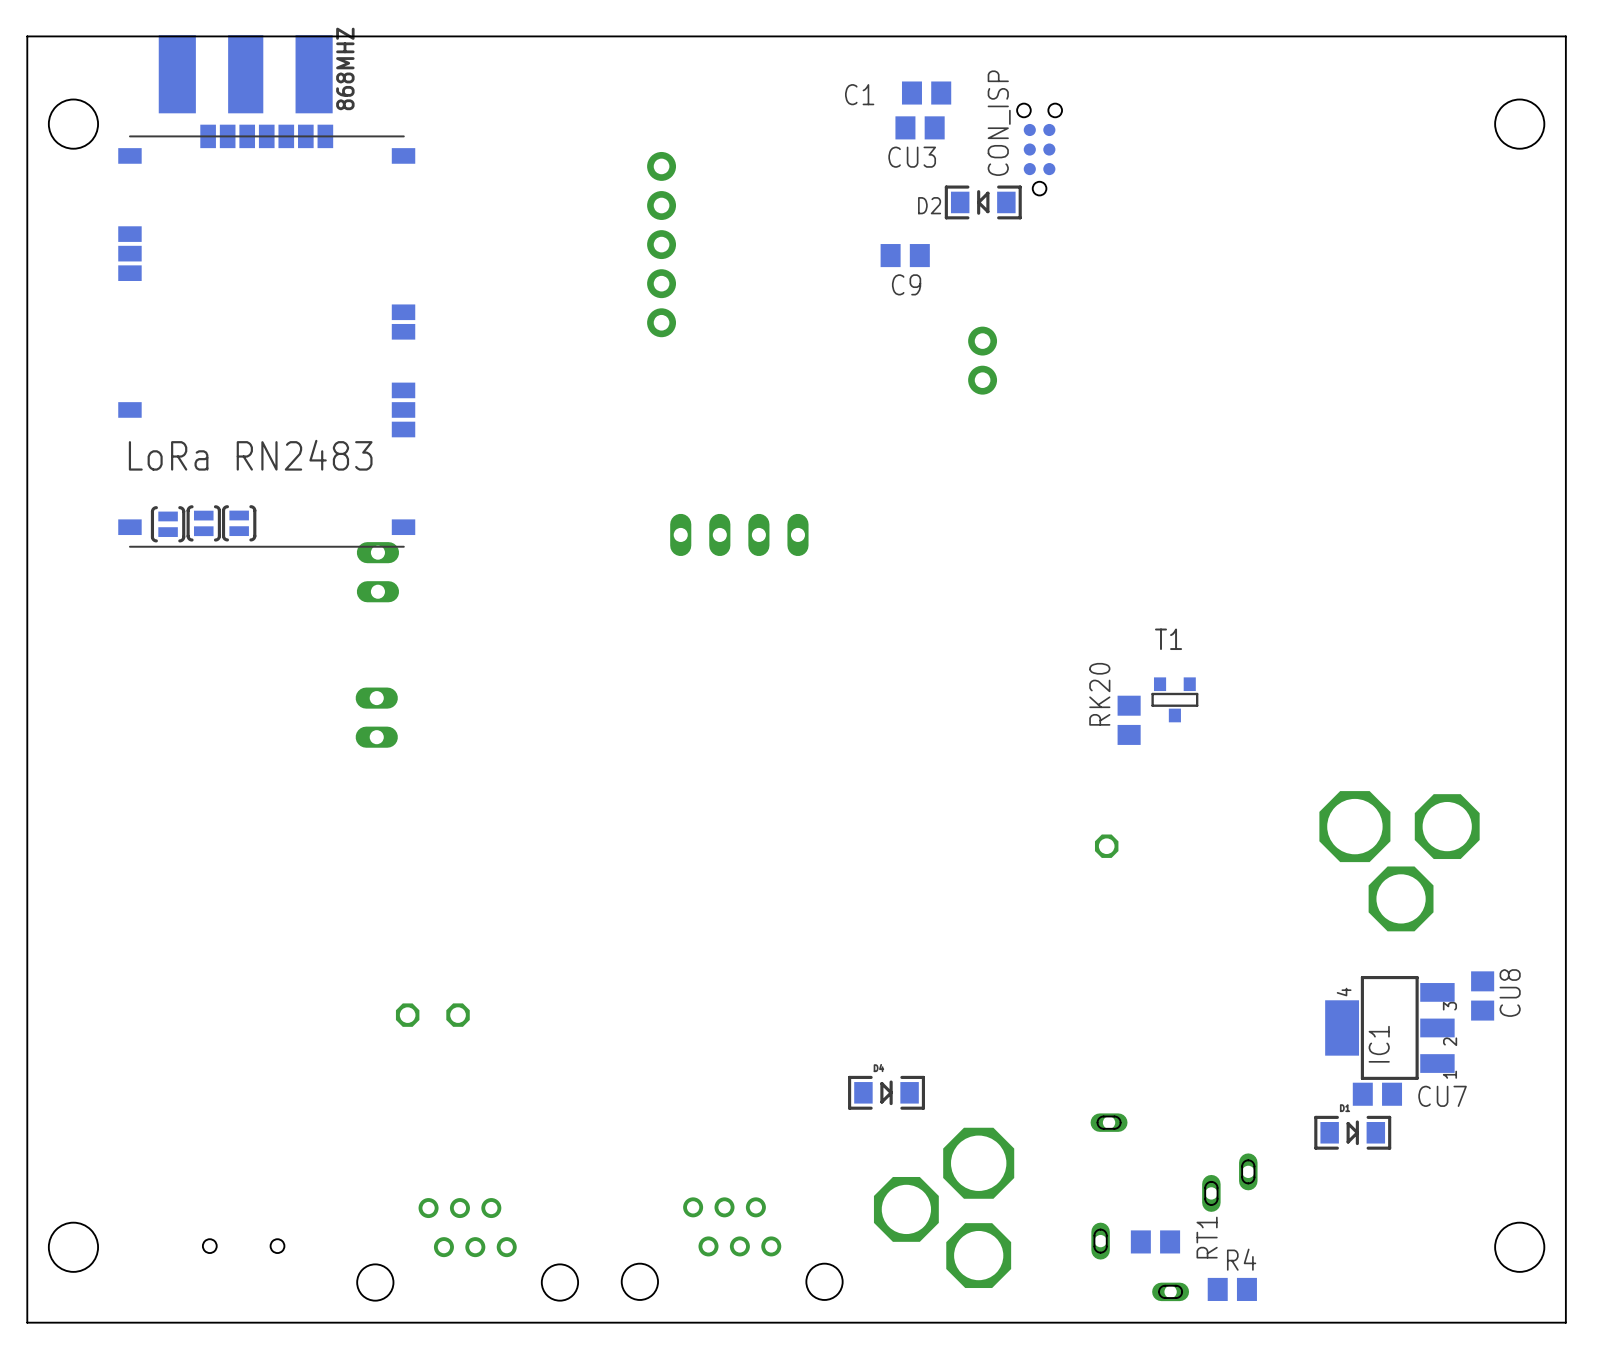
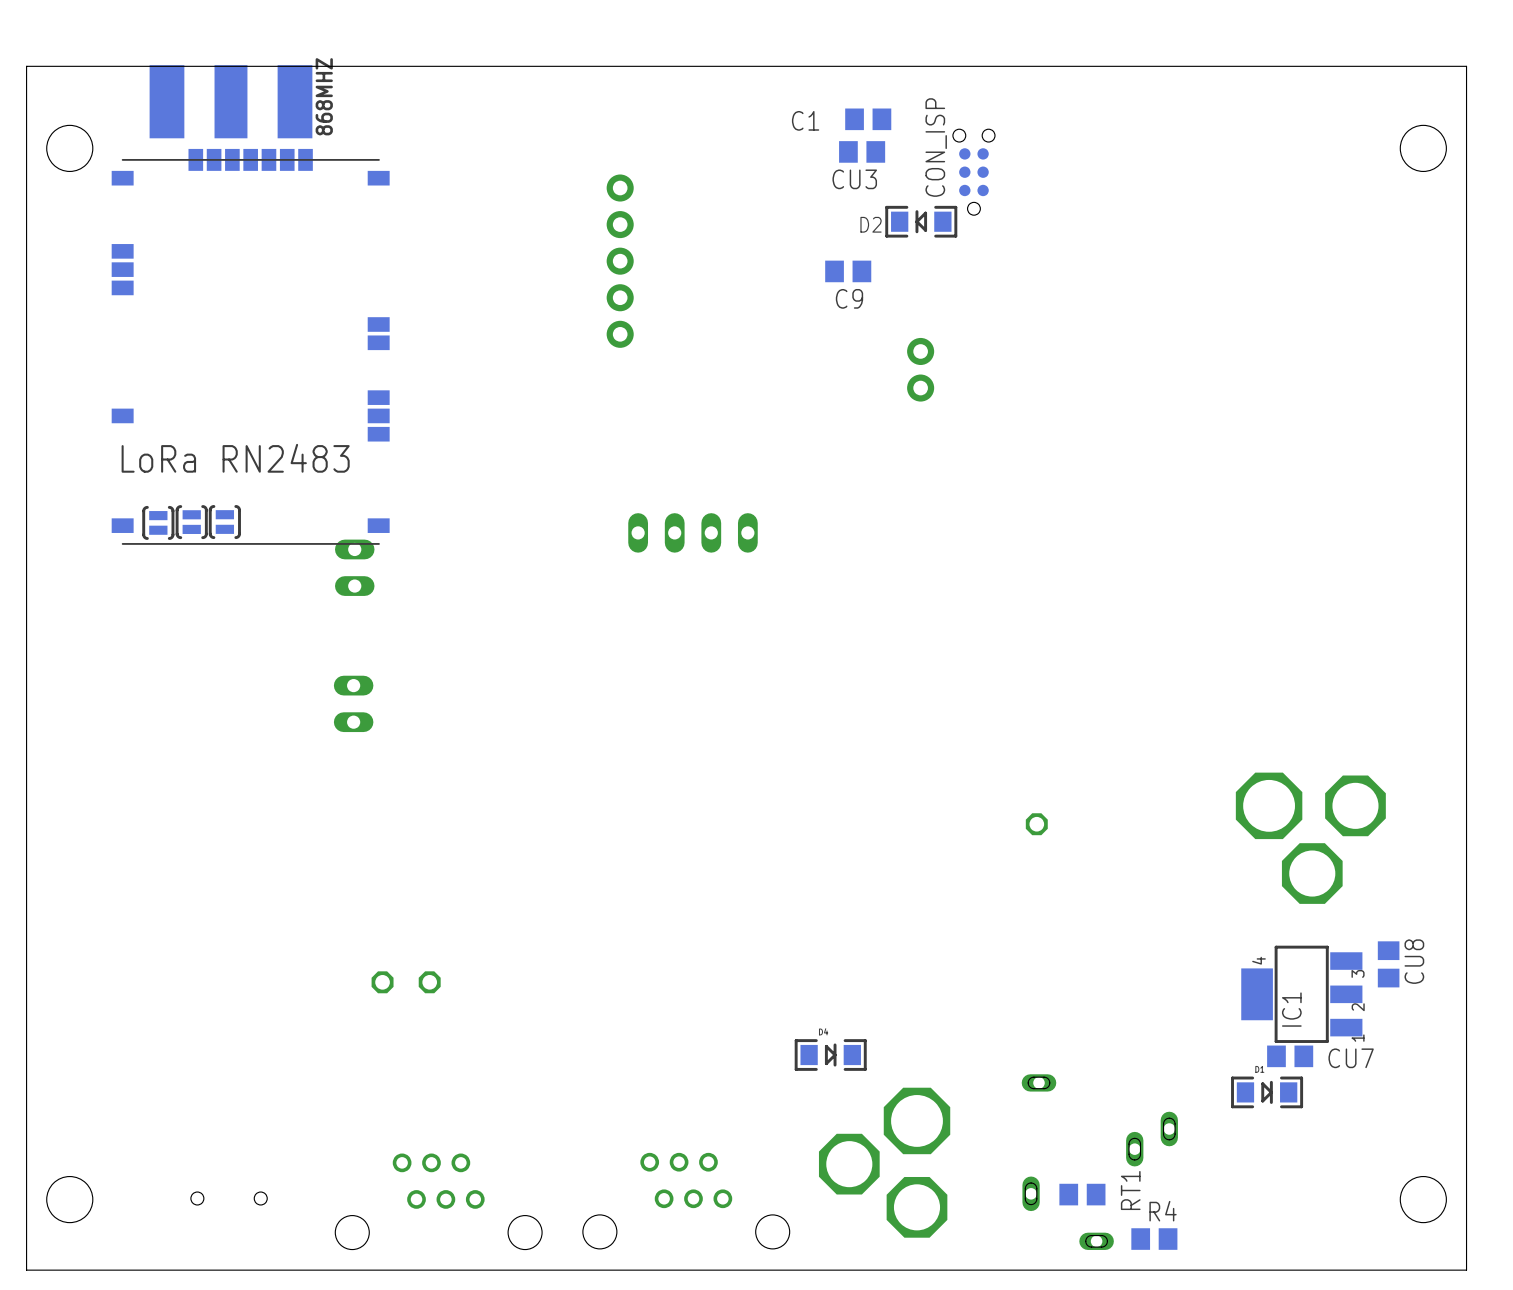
T1: (1174, 699) -> none
RK20: (1129, 720) -> none

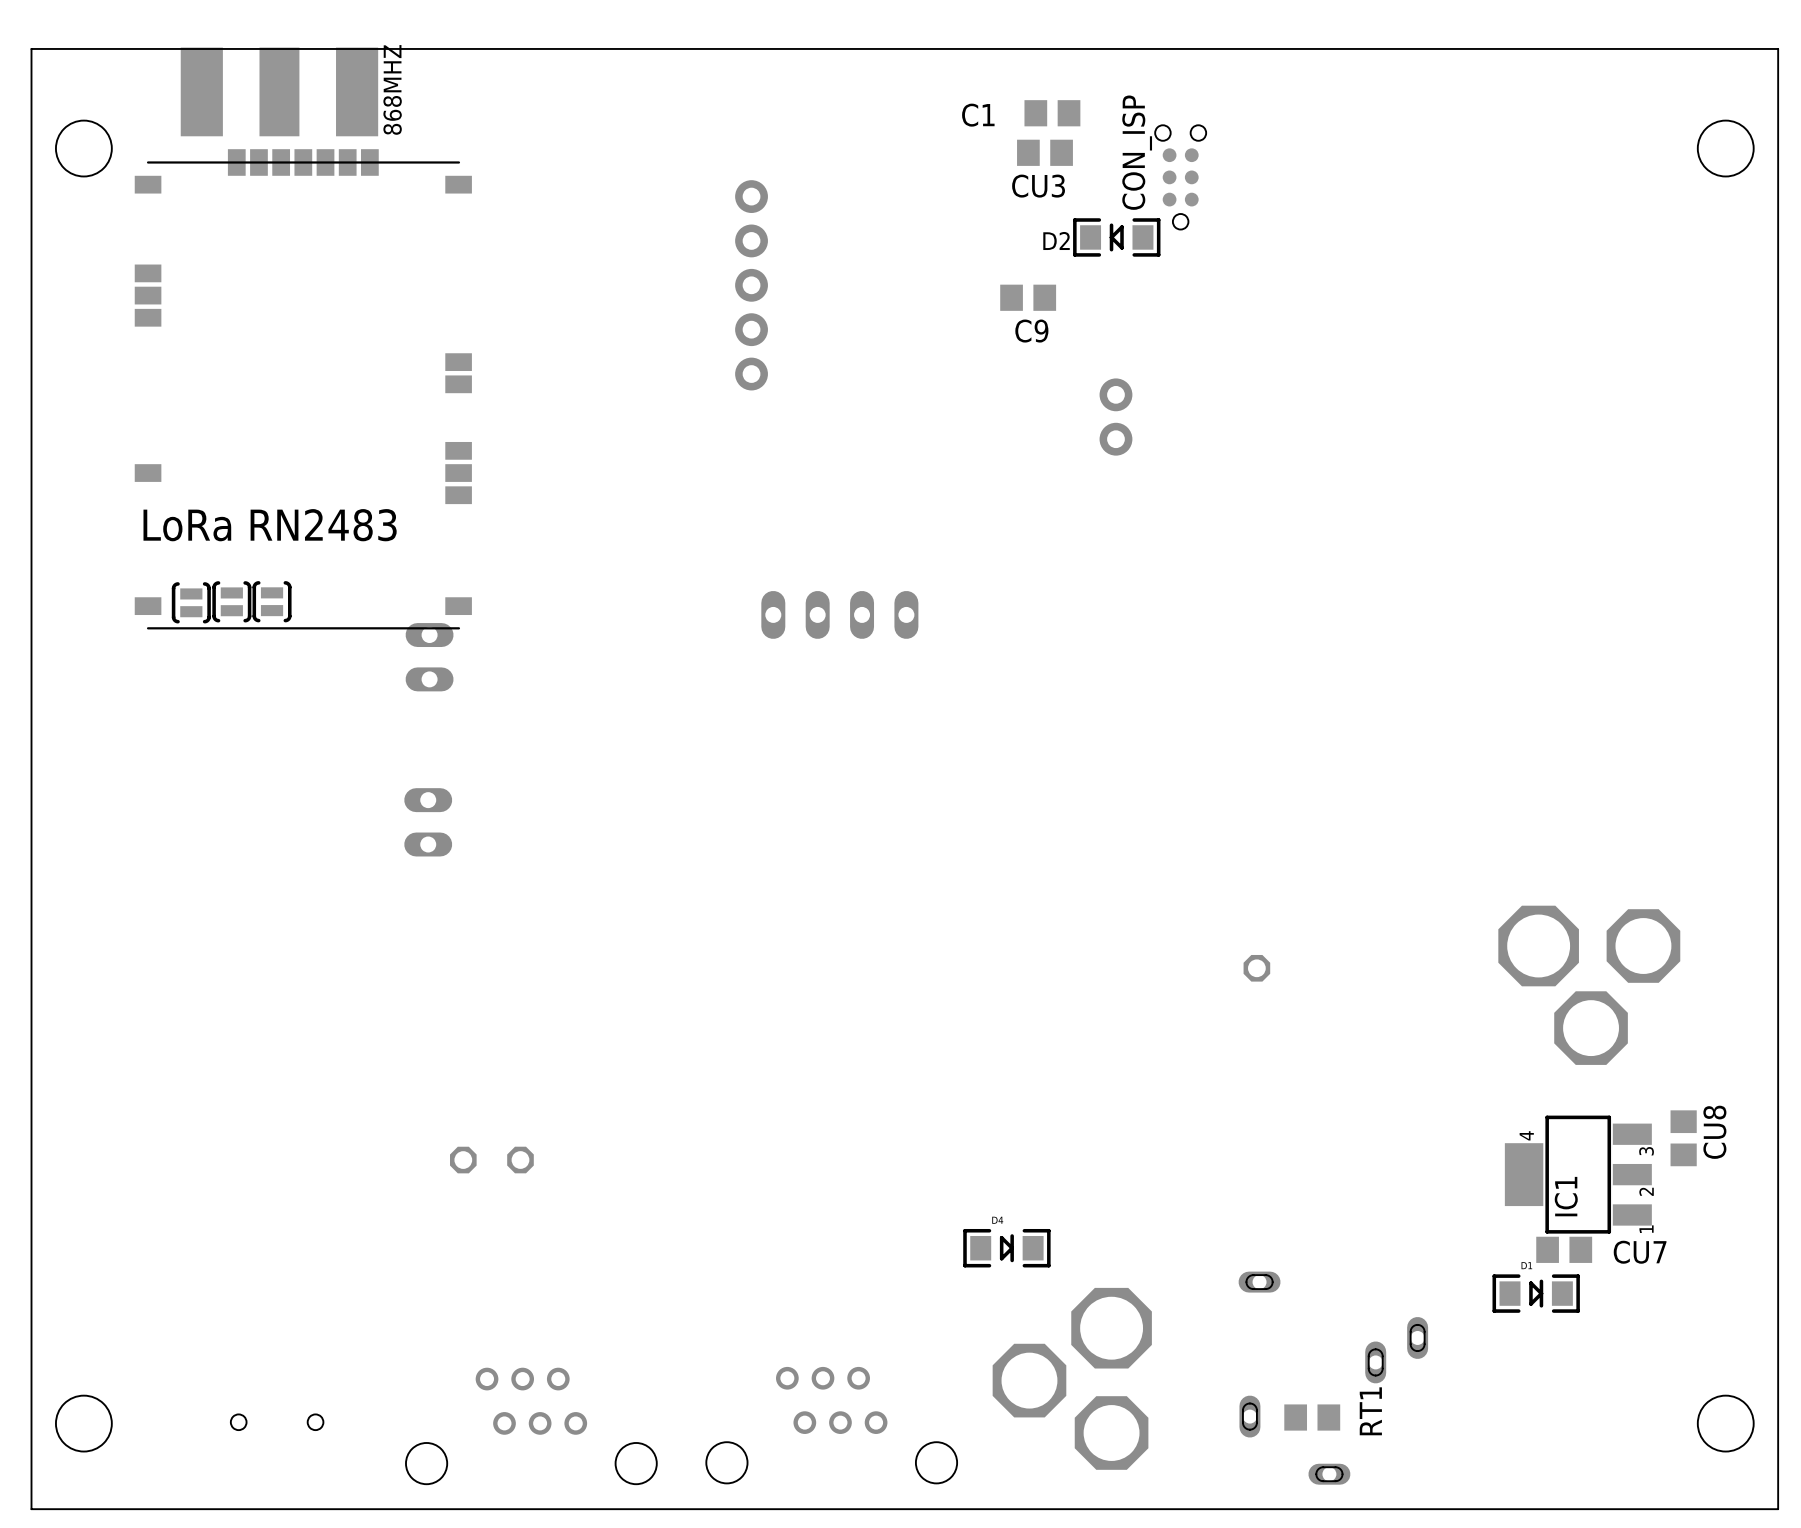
R4: (1154, 1239) -> none

